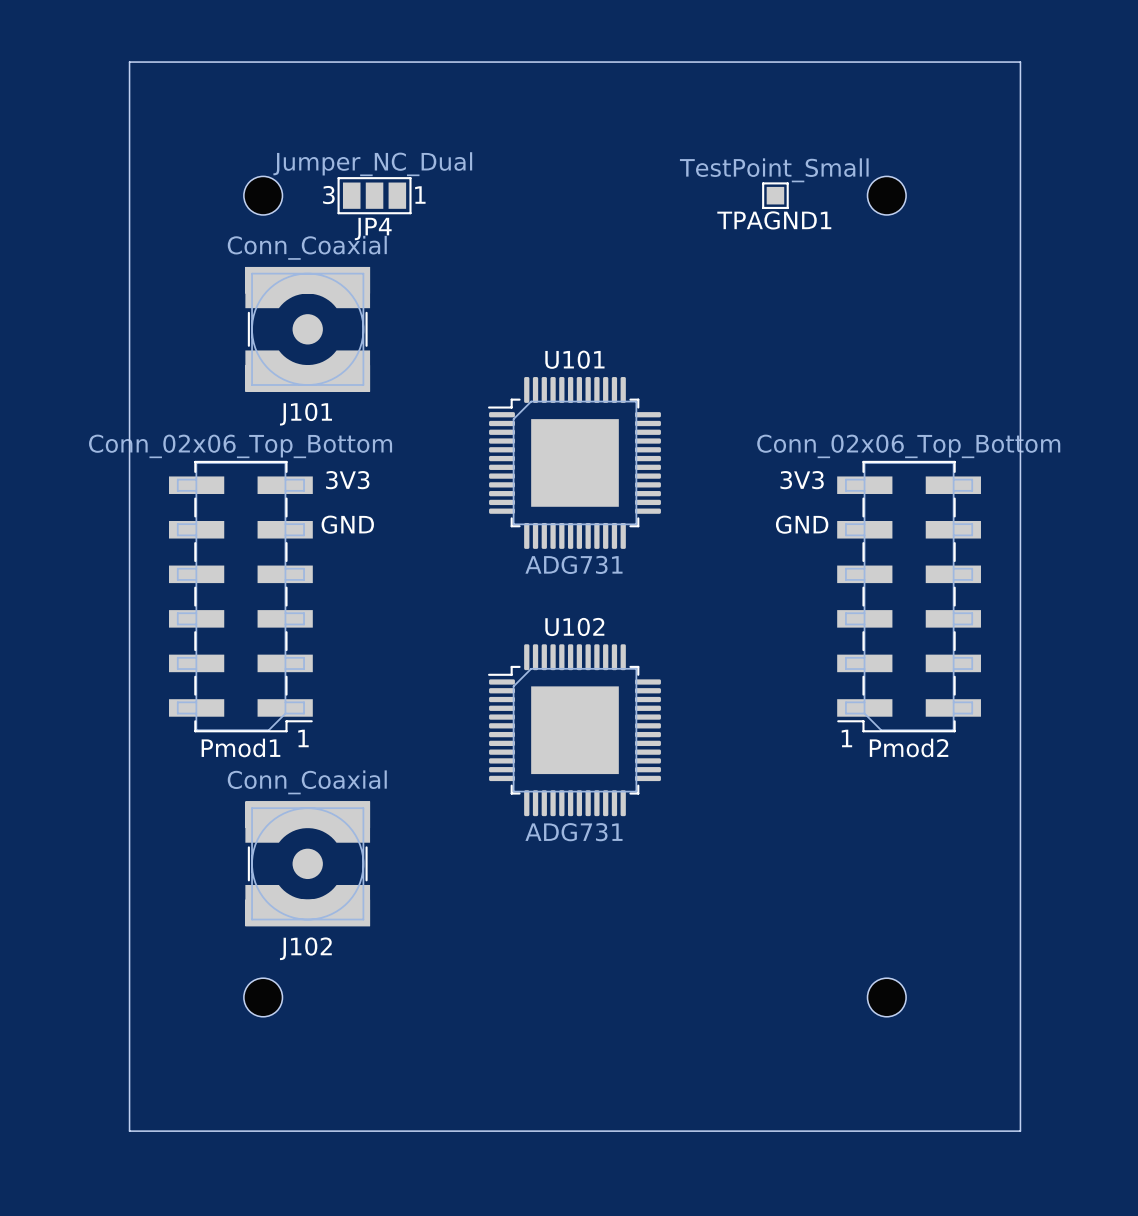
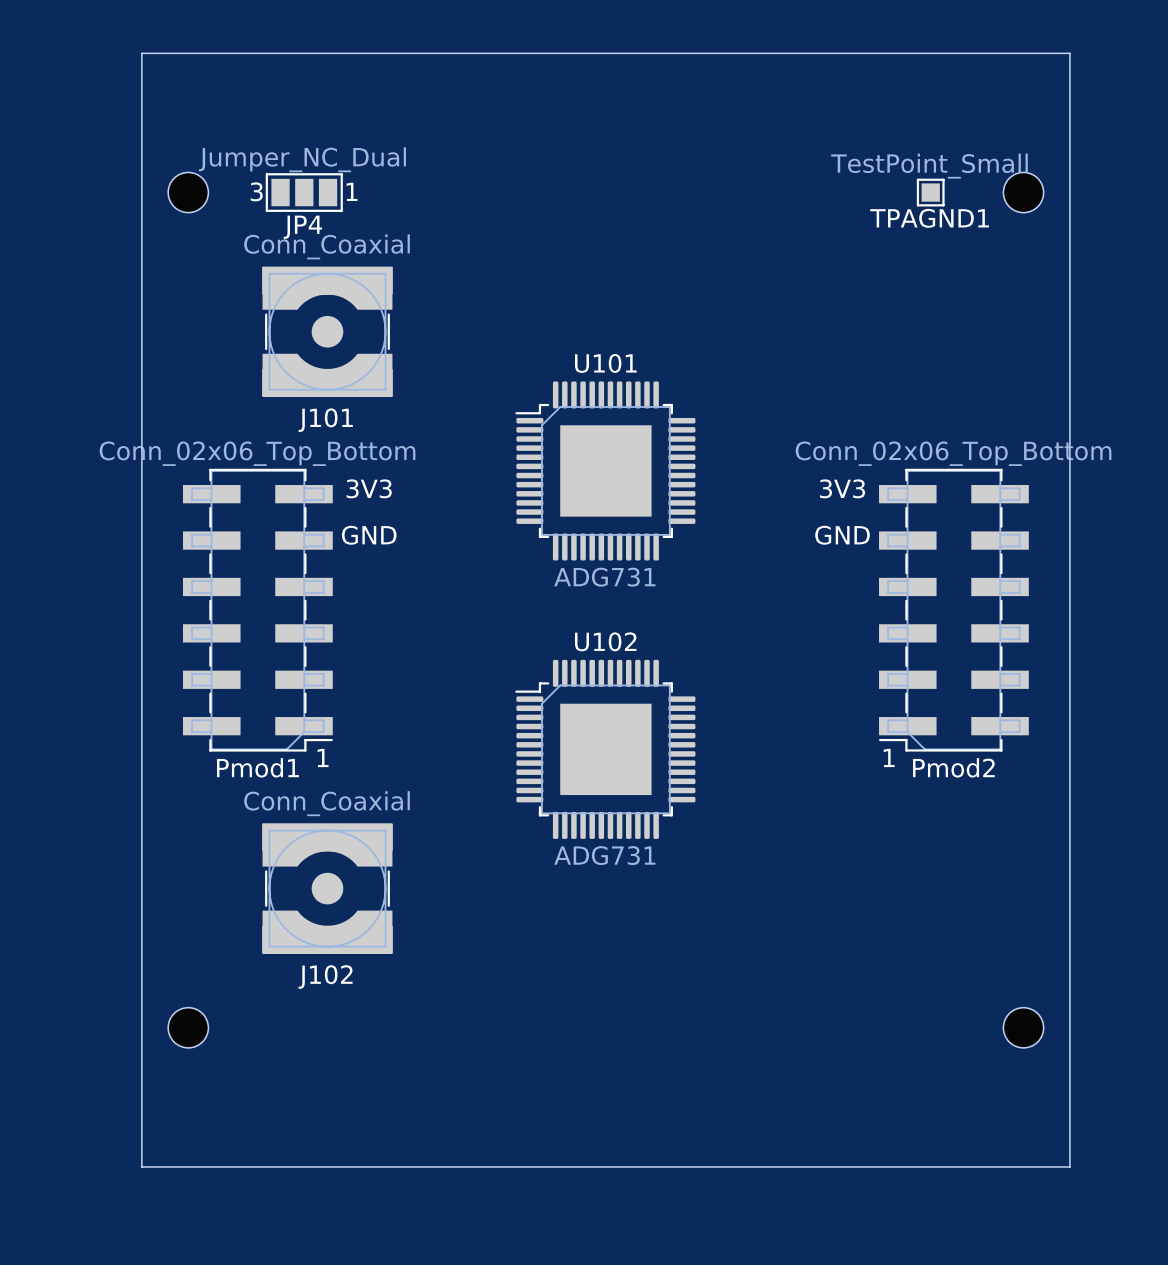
part position: (263, 195) -> (188, 192)
JP4 position: (374, 195) -> (304, 192)
TPAGND1 position: (775, 195) -> (930, 192)
part position: (886, 195) -> (1023, 192)
part position: (263, 997) -> (188, 1027)
part position: (886, 997) -> (1023, 1027)

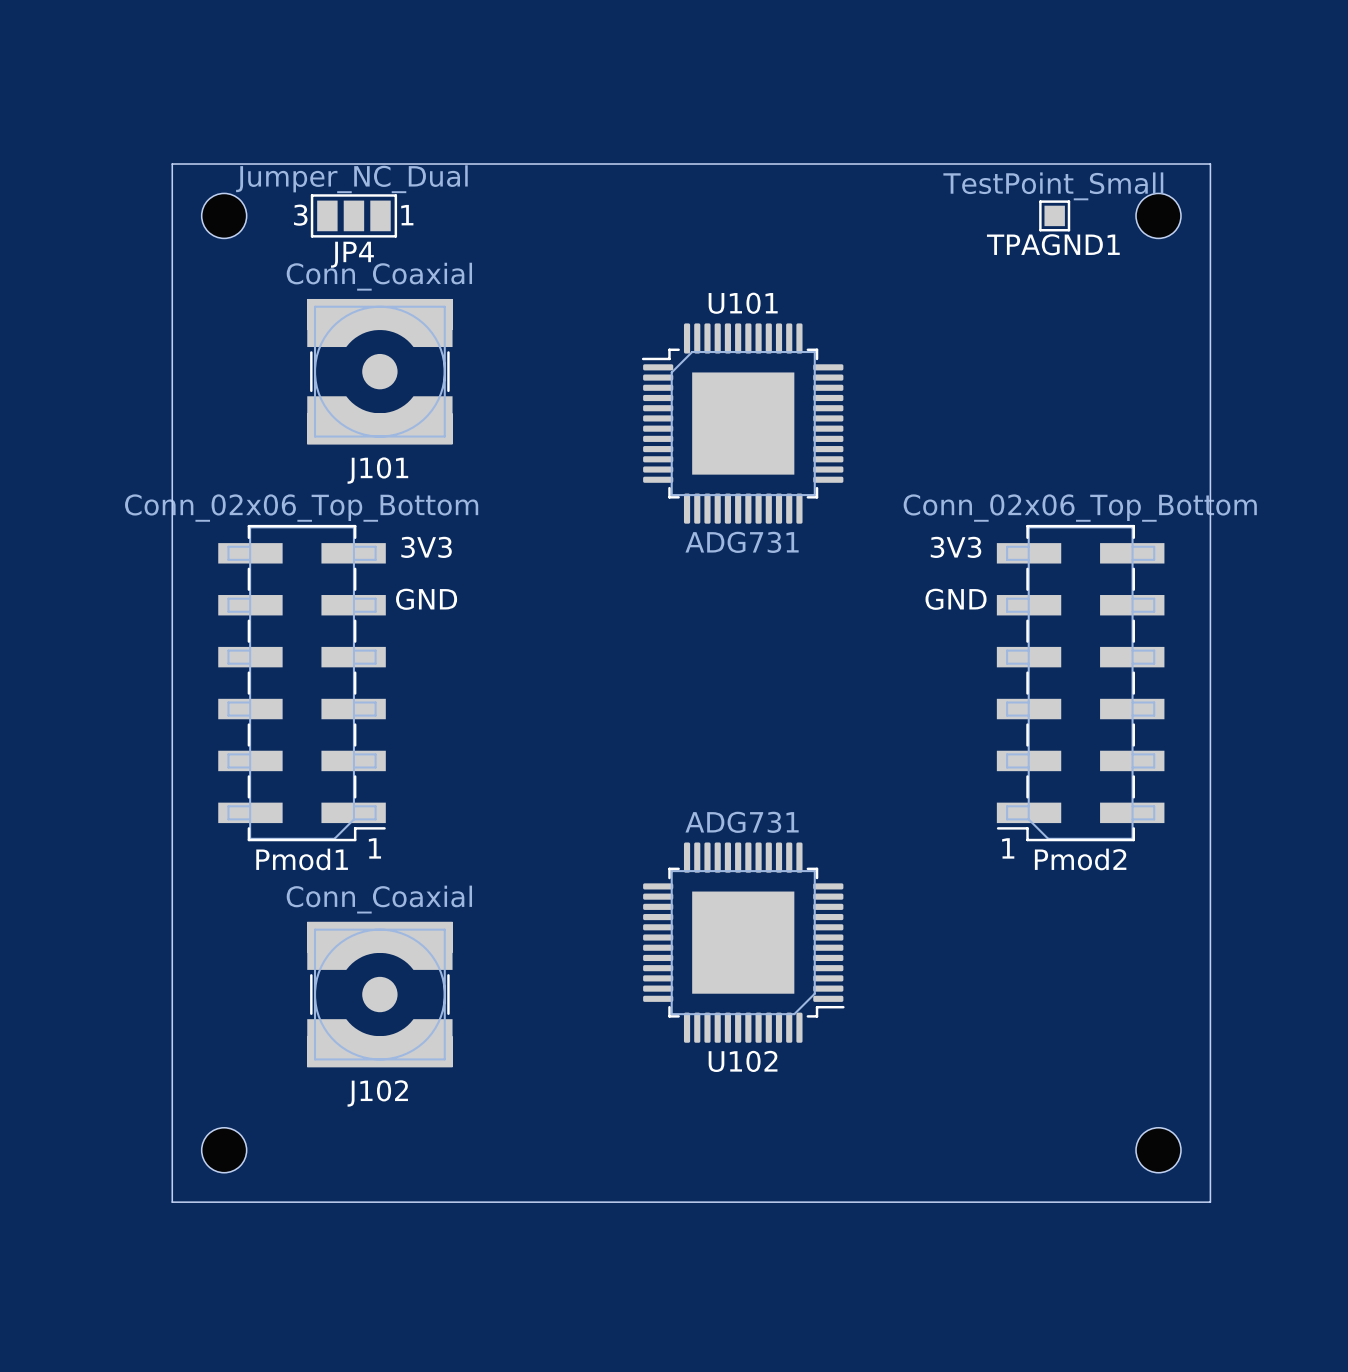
board edge: (1069, 146) (1069, 53) (141, 53) (141, 146) -> (1210, 164) (172, 164)
U101 position: (605, 470) -> (742, 423)
U102 rotation: 0° (605, 749) -> 180° (743, 942)
board edge: (1069, 1074) (1069, 1167) (141, 1167) (141, 1074) -> (1210, 1202) (172, 1202)

